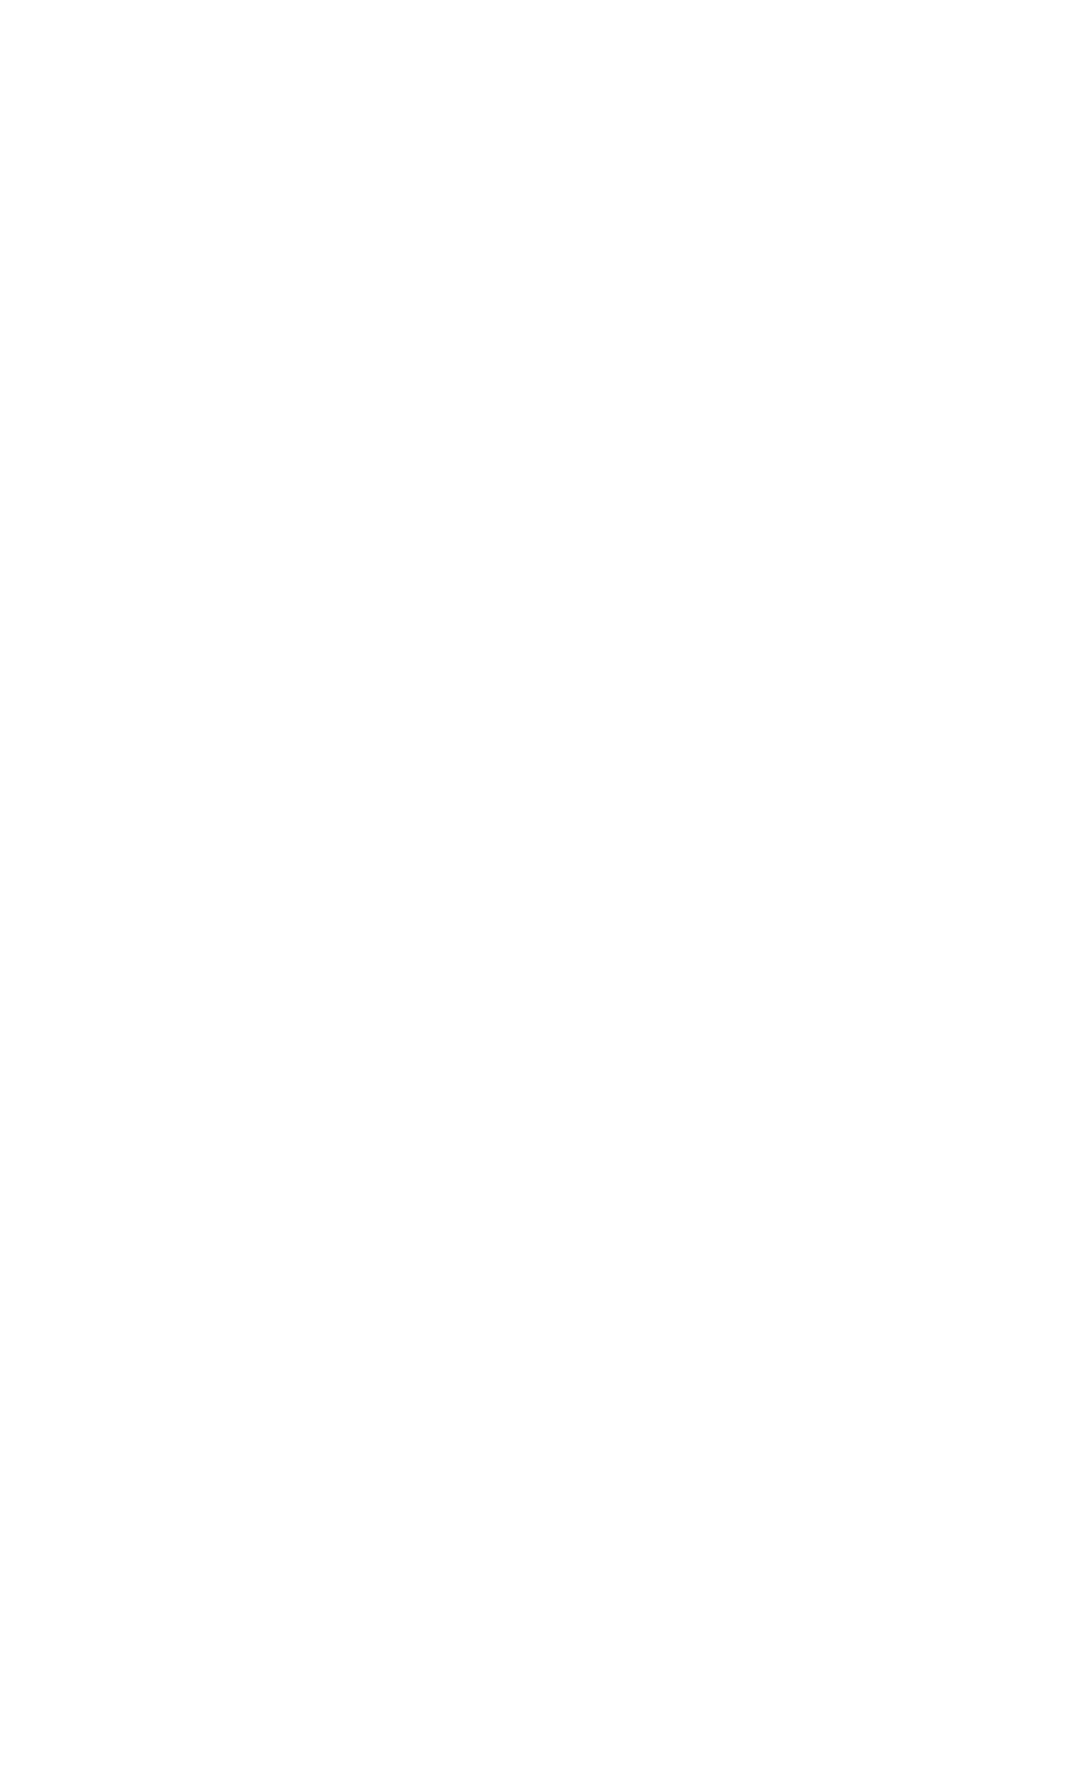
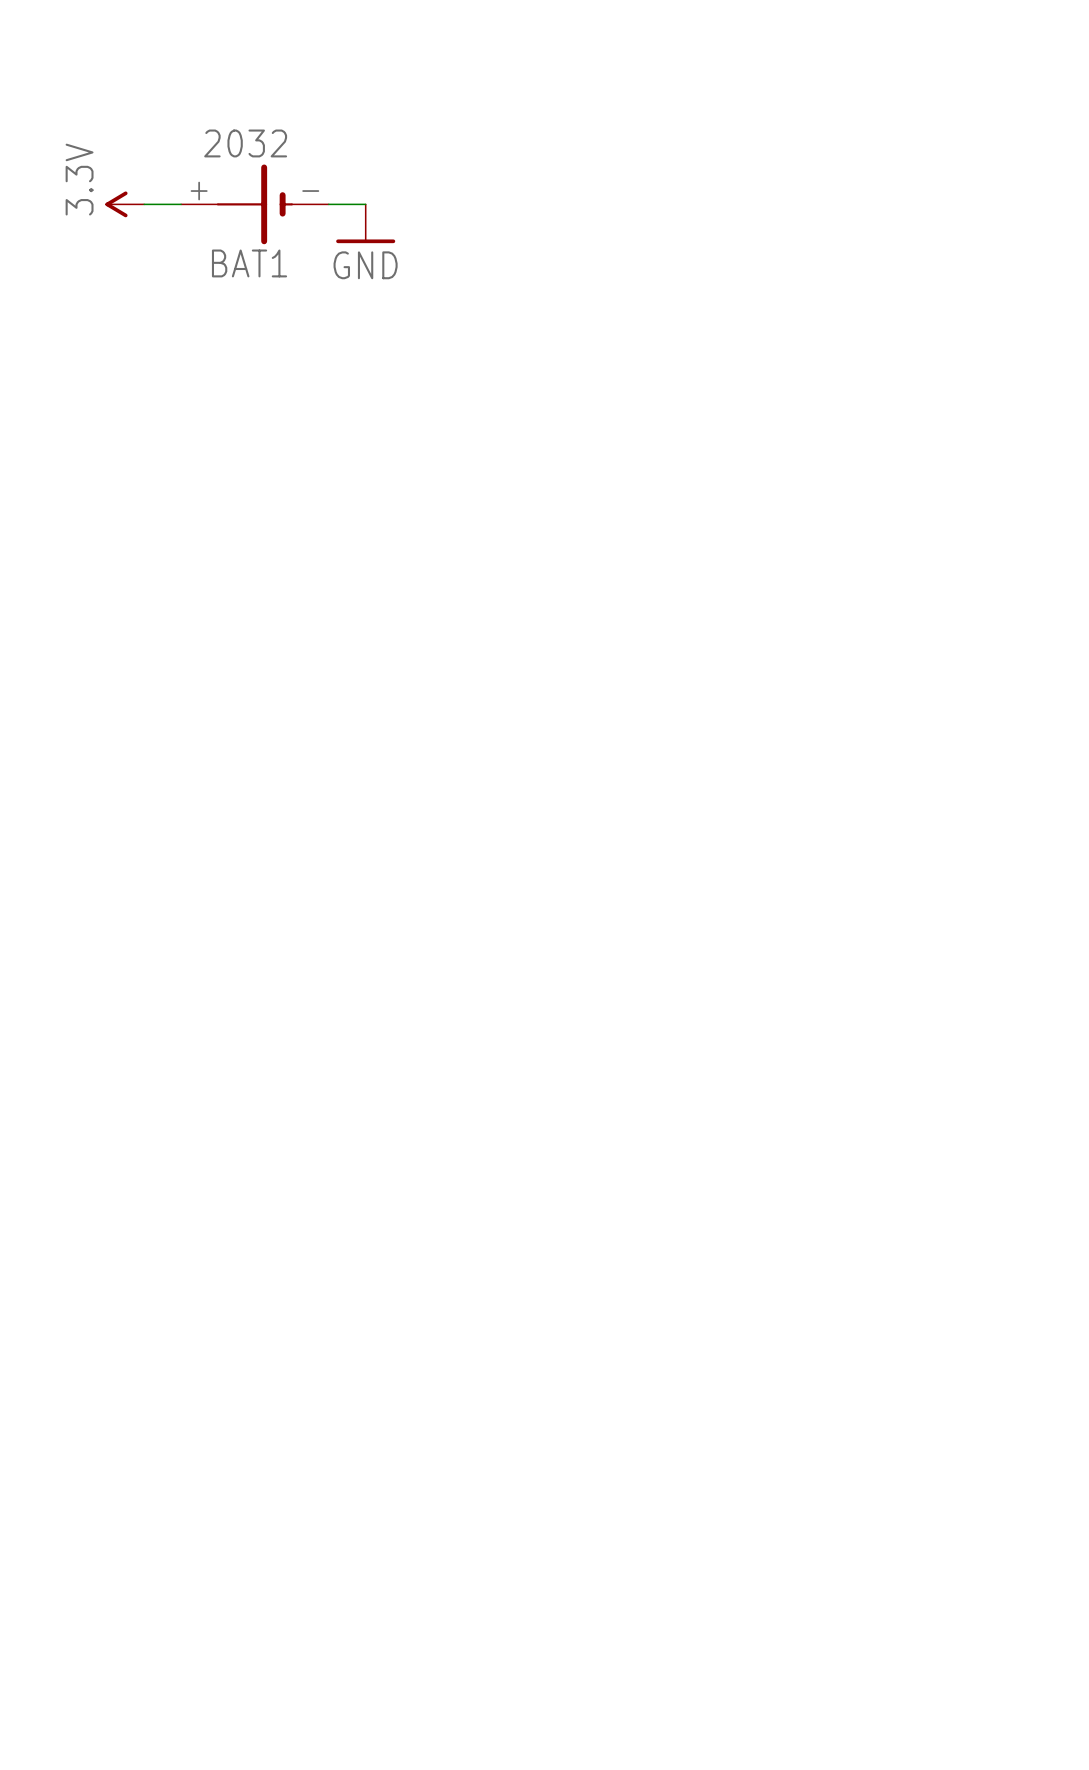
power symbol: none -> 3.3V (124, 204)
wire: none -> (144, 204) (181, 204)
BAT1: none -> 2032 (254, 204)
wire: none -> (328, 204) (365, 204)
power symbol: none -> GND (365, 223)

